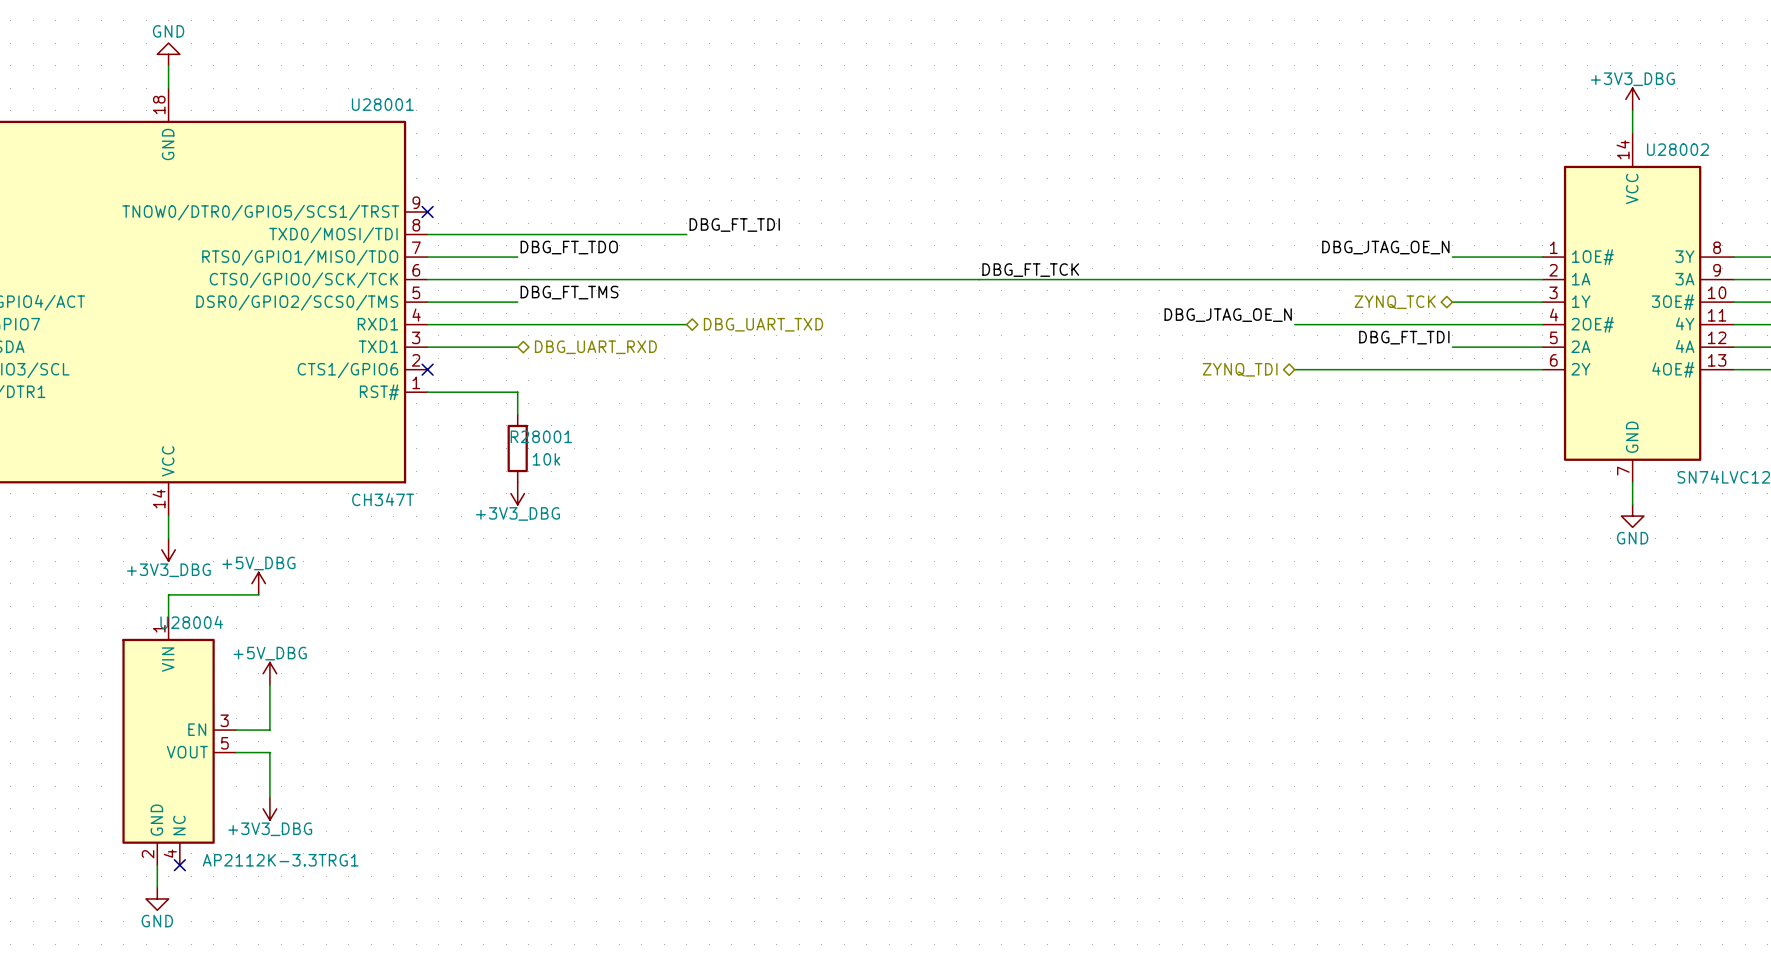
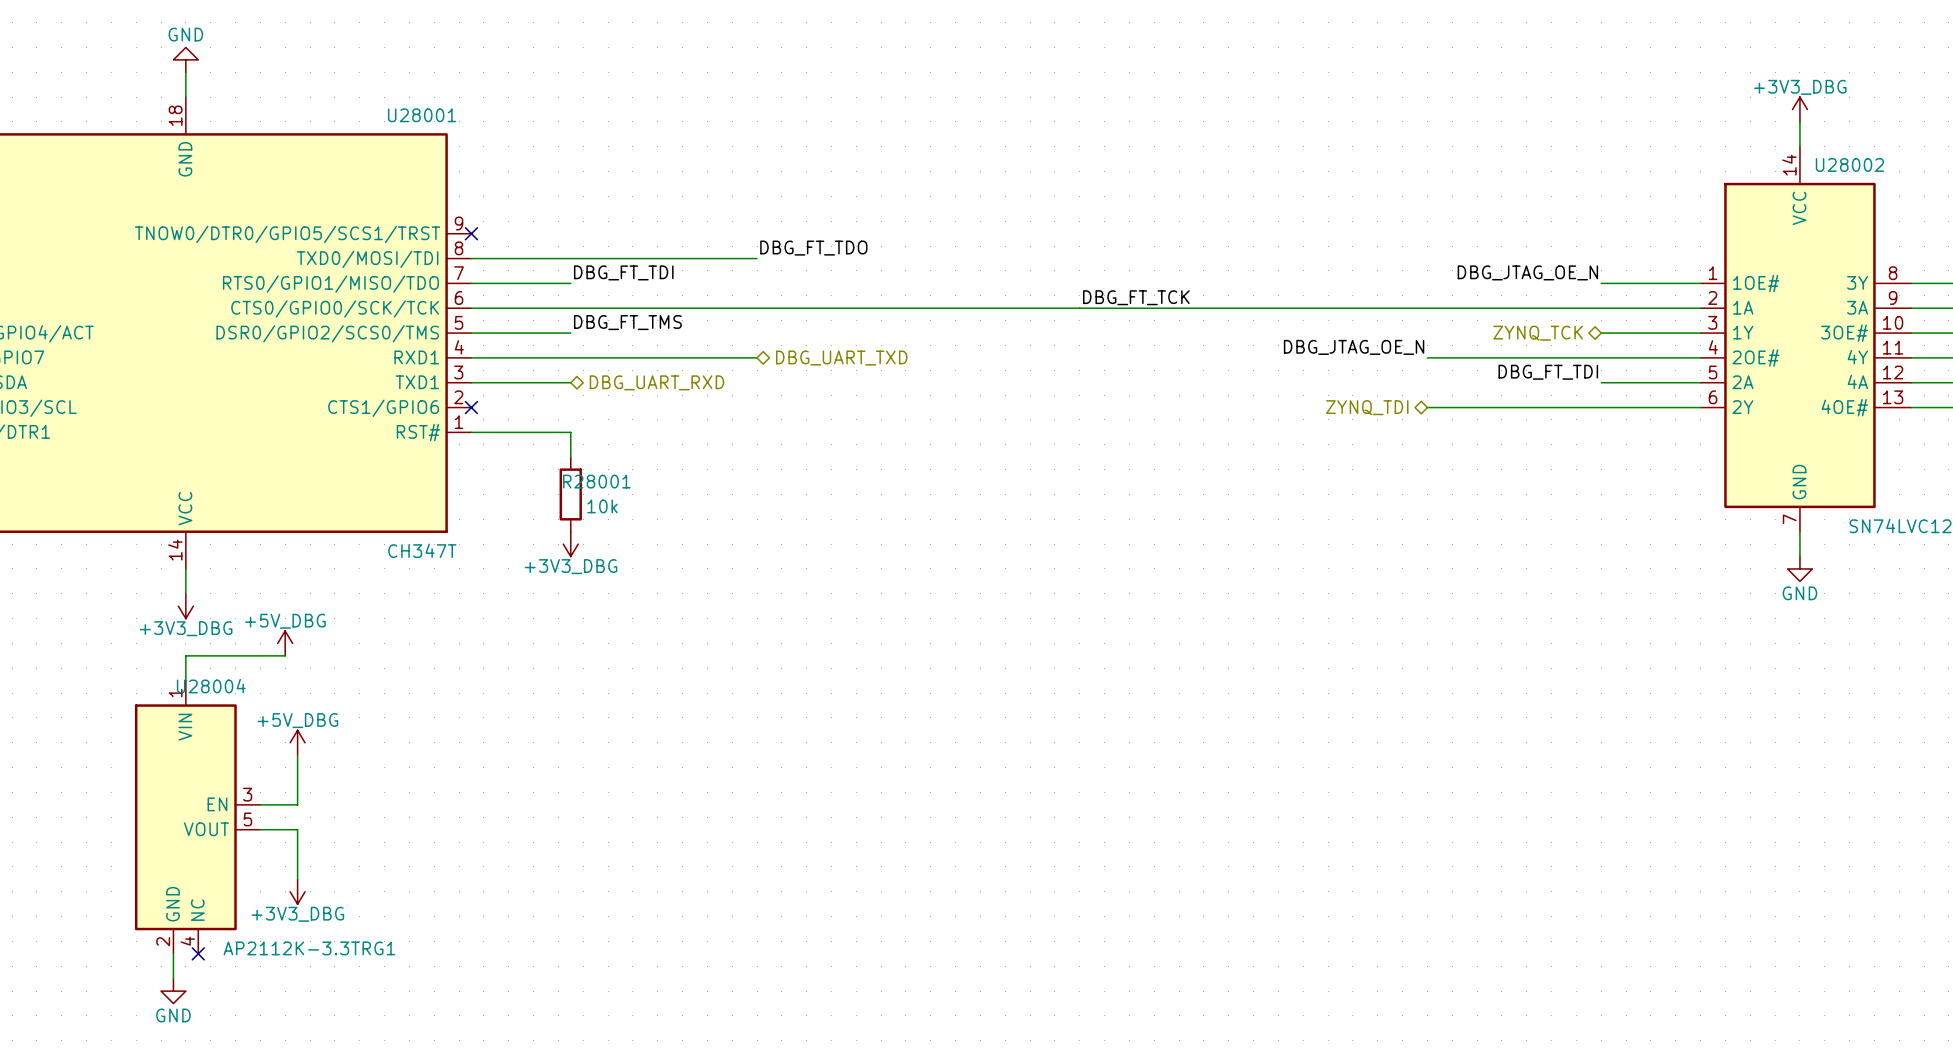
label: DBG_FT_TDI (734, 225) -> DBG_FT_TDO (813, 248)
label: DBG_FT_TDO (569, 247) -> DBG_FT_TDI (623, 272)

